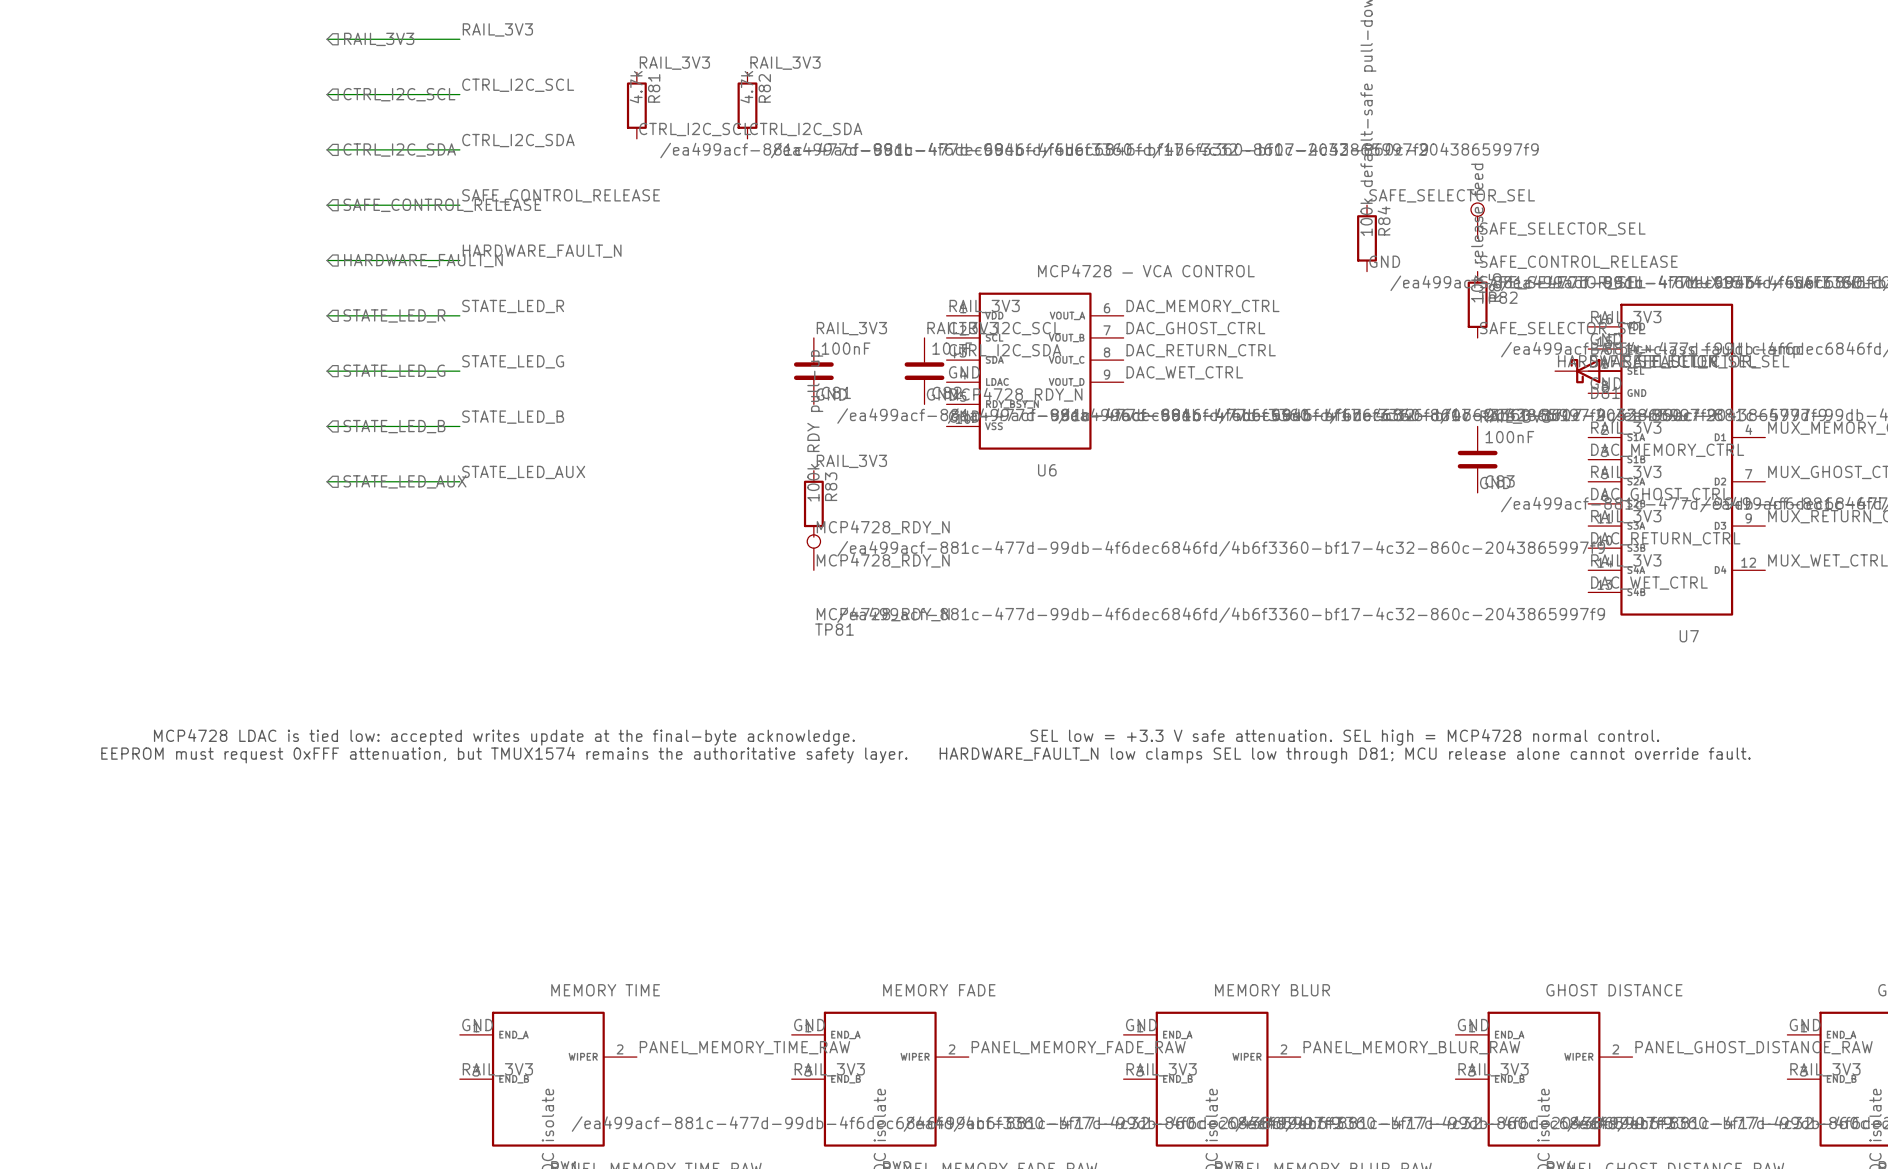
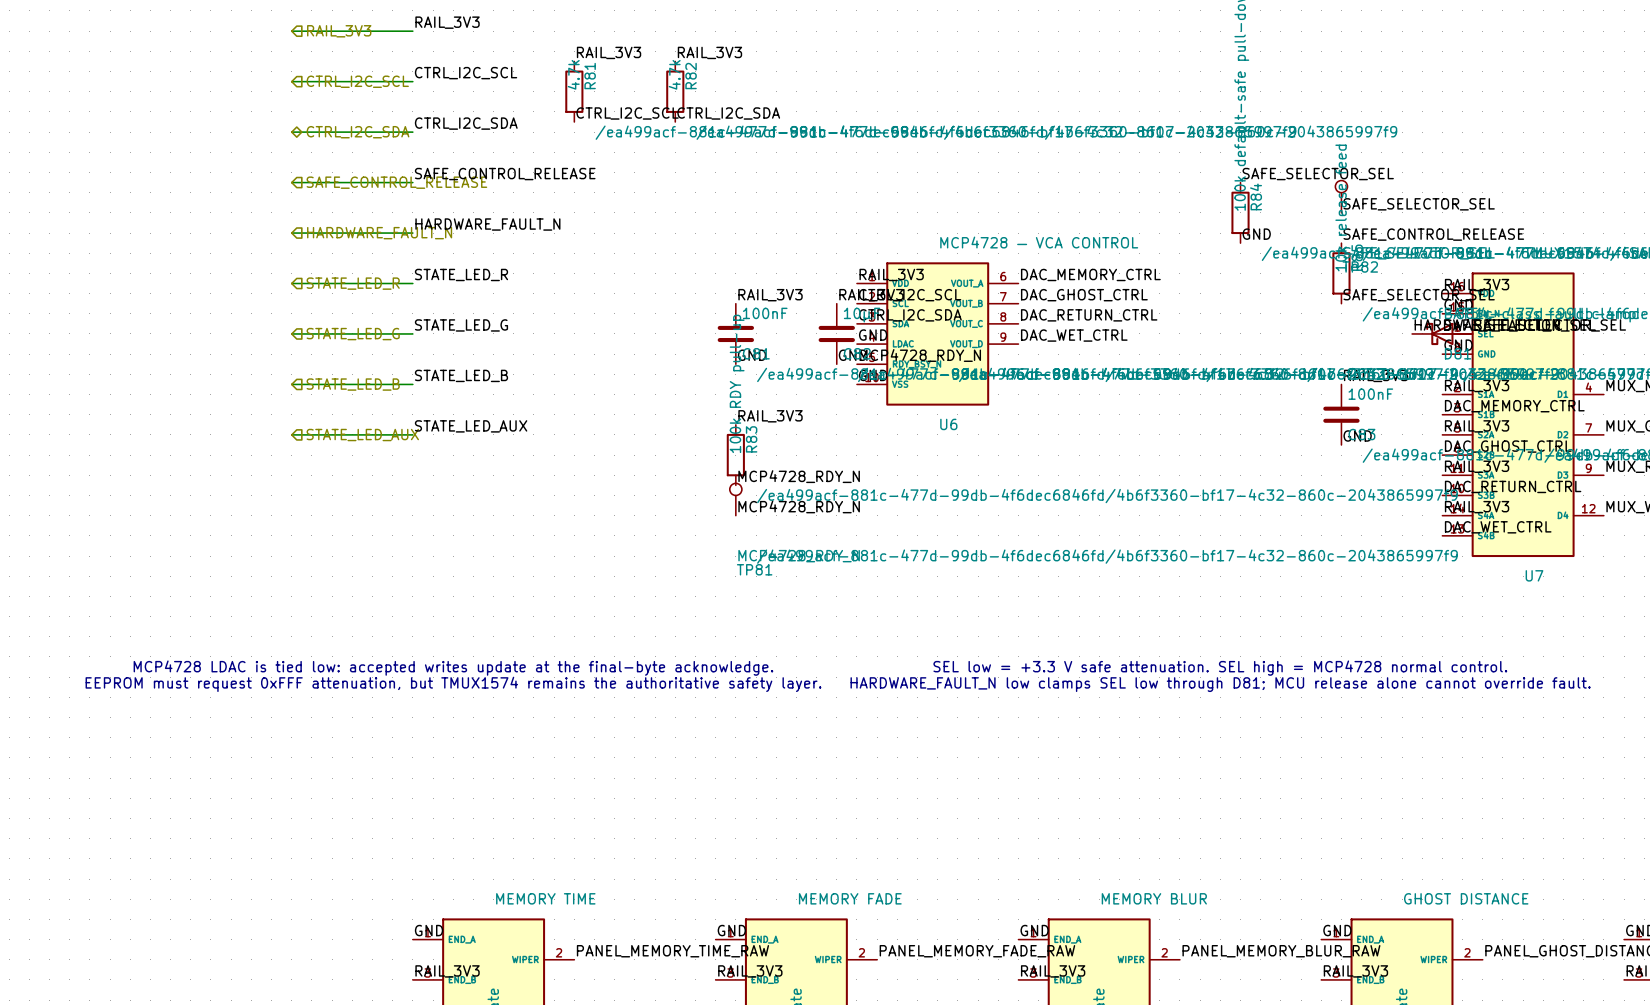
hierarchical label shape: input (399, 150) -> bidirectional (357, 132)

